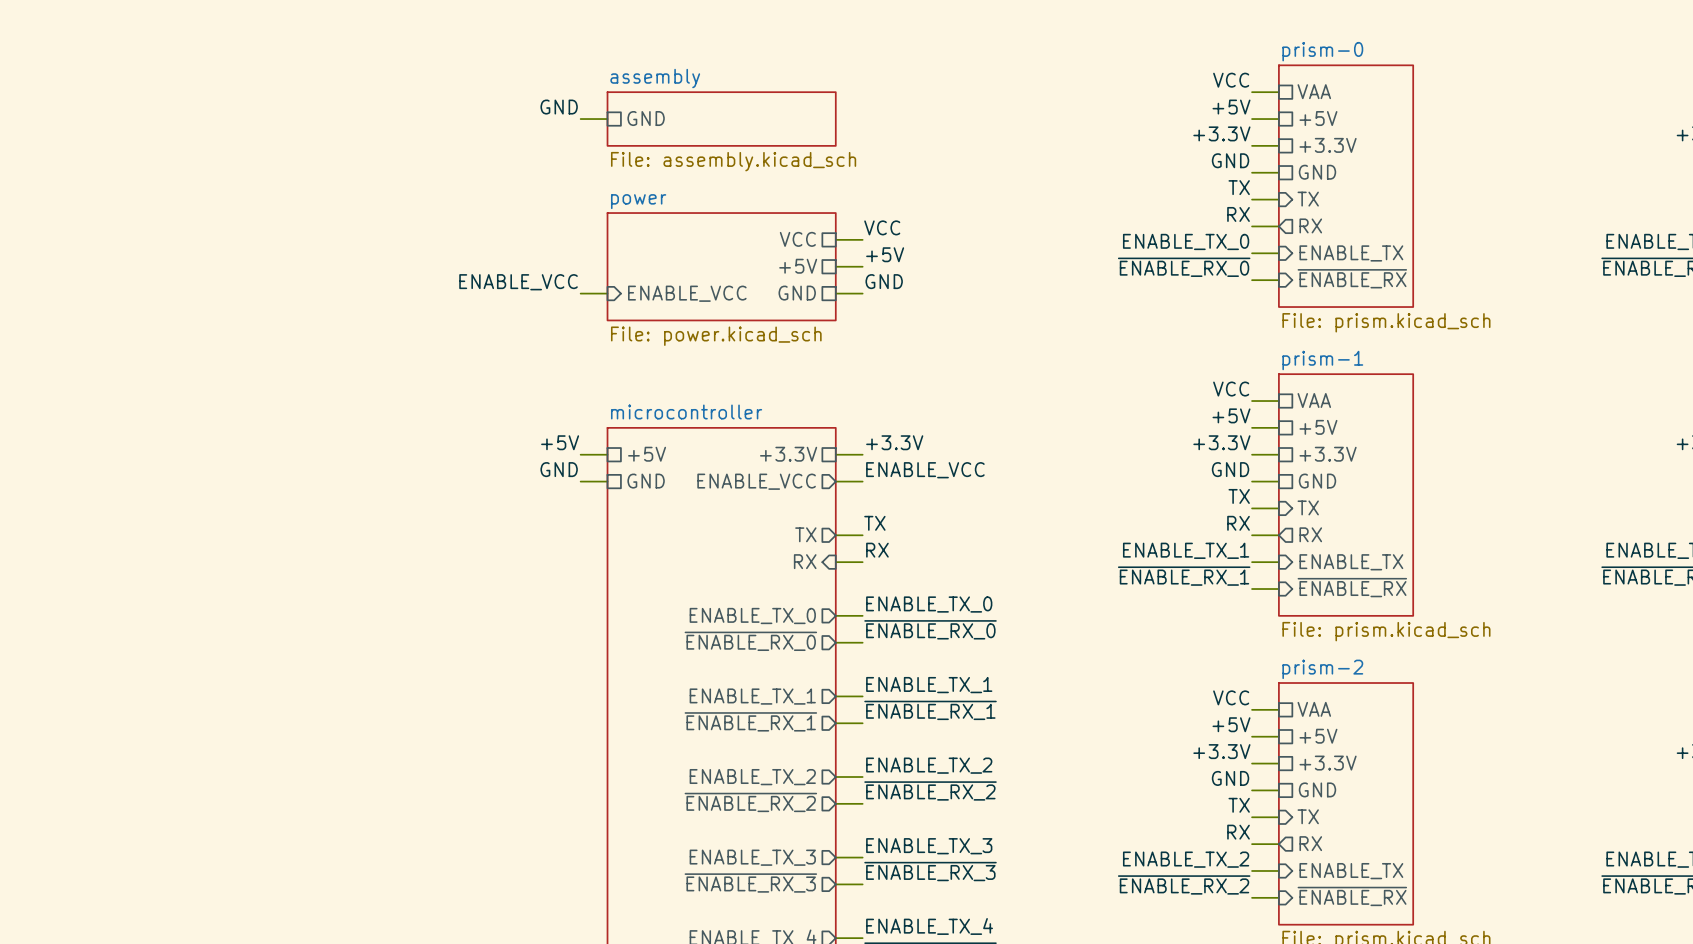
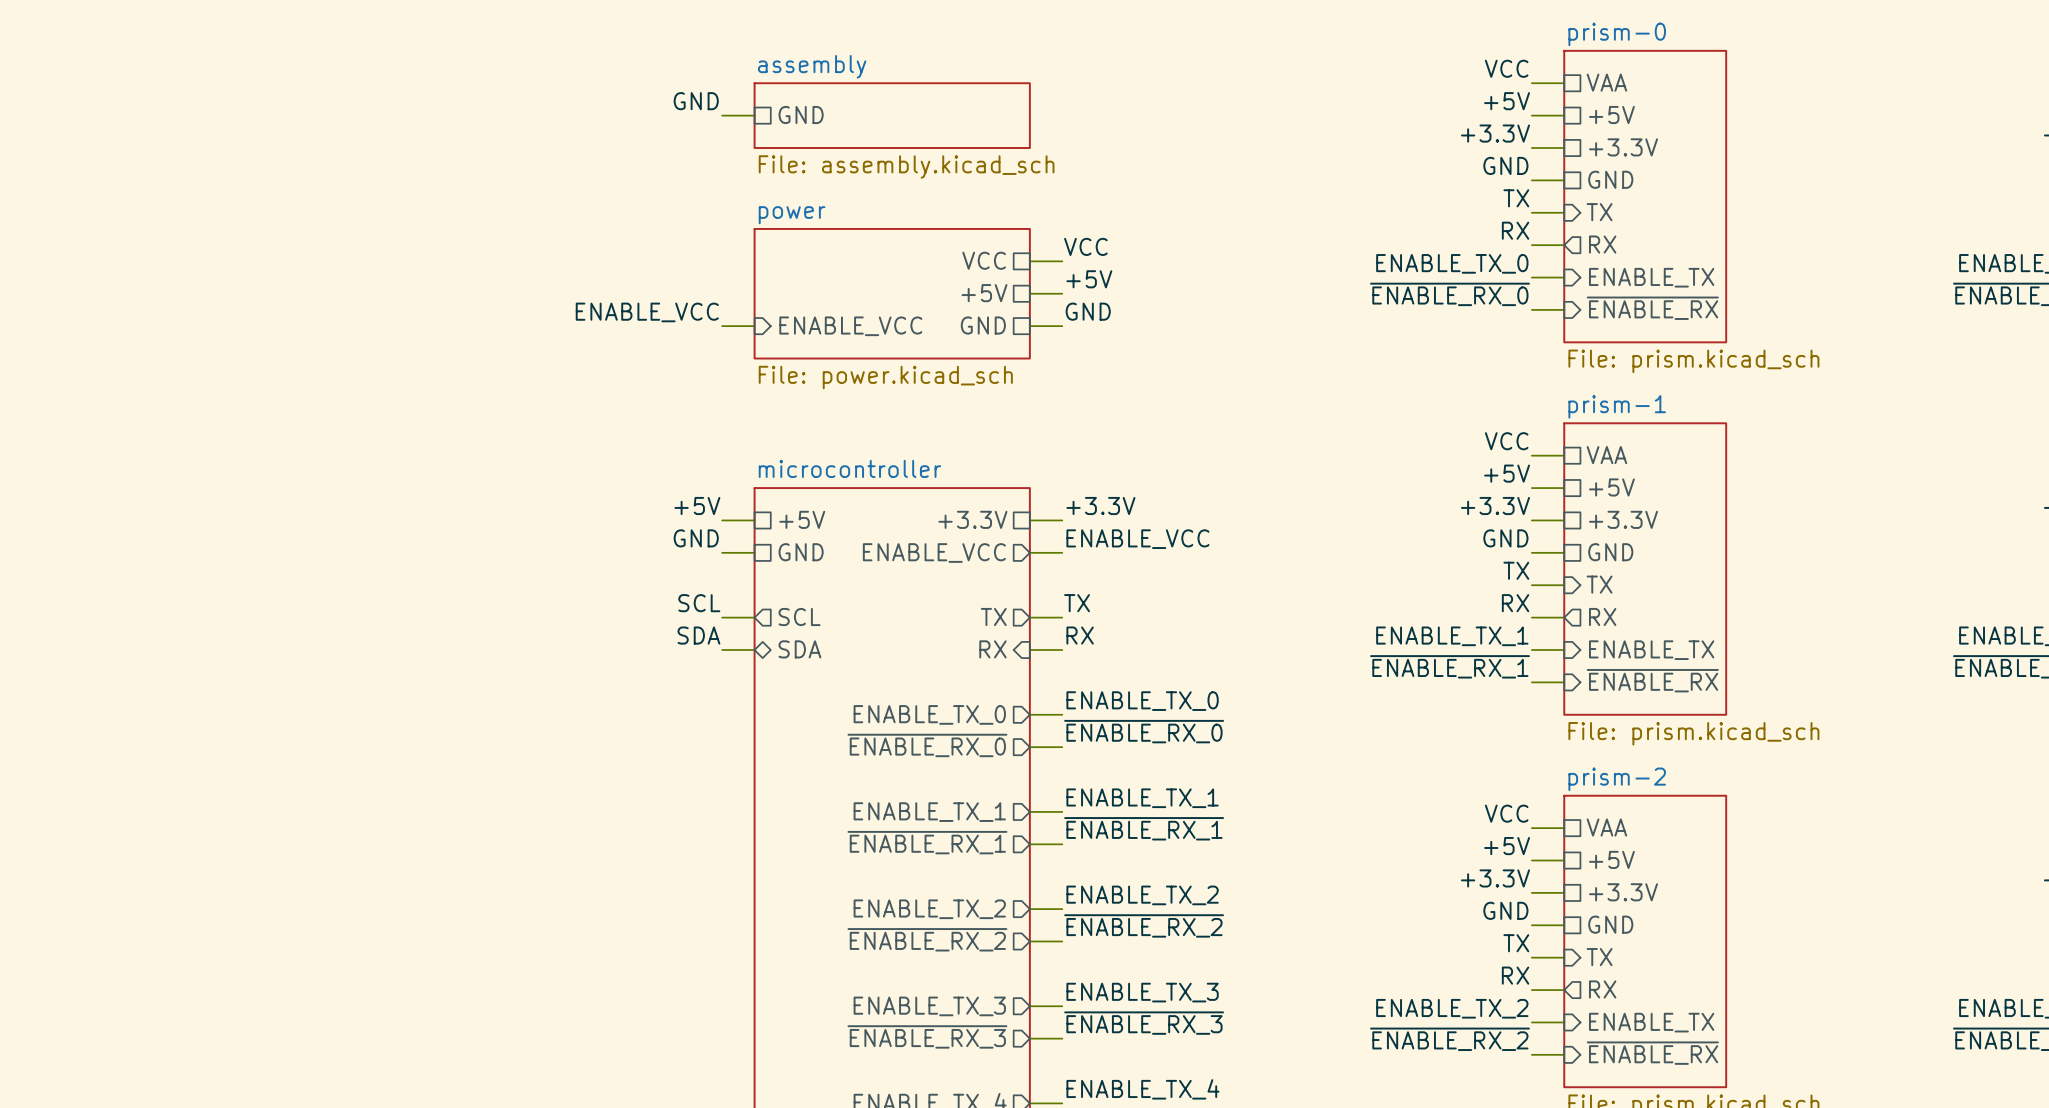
label: none -> SCL (699, 603)
sheet pin: none -> SCL (799, 617)
wire: none -> (722, 617) (754, 617)
label: none -> SDA (698, 635)
sheet pin: none -> SDA (799, 649)
wire: none -> (722, 650) (754, 650)

